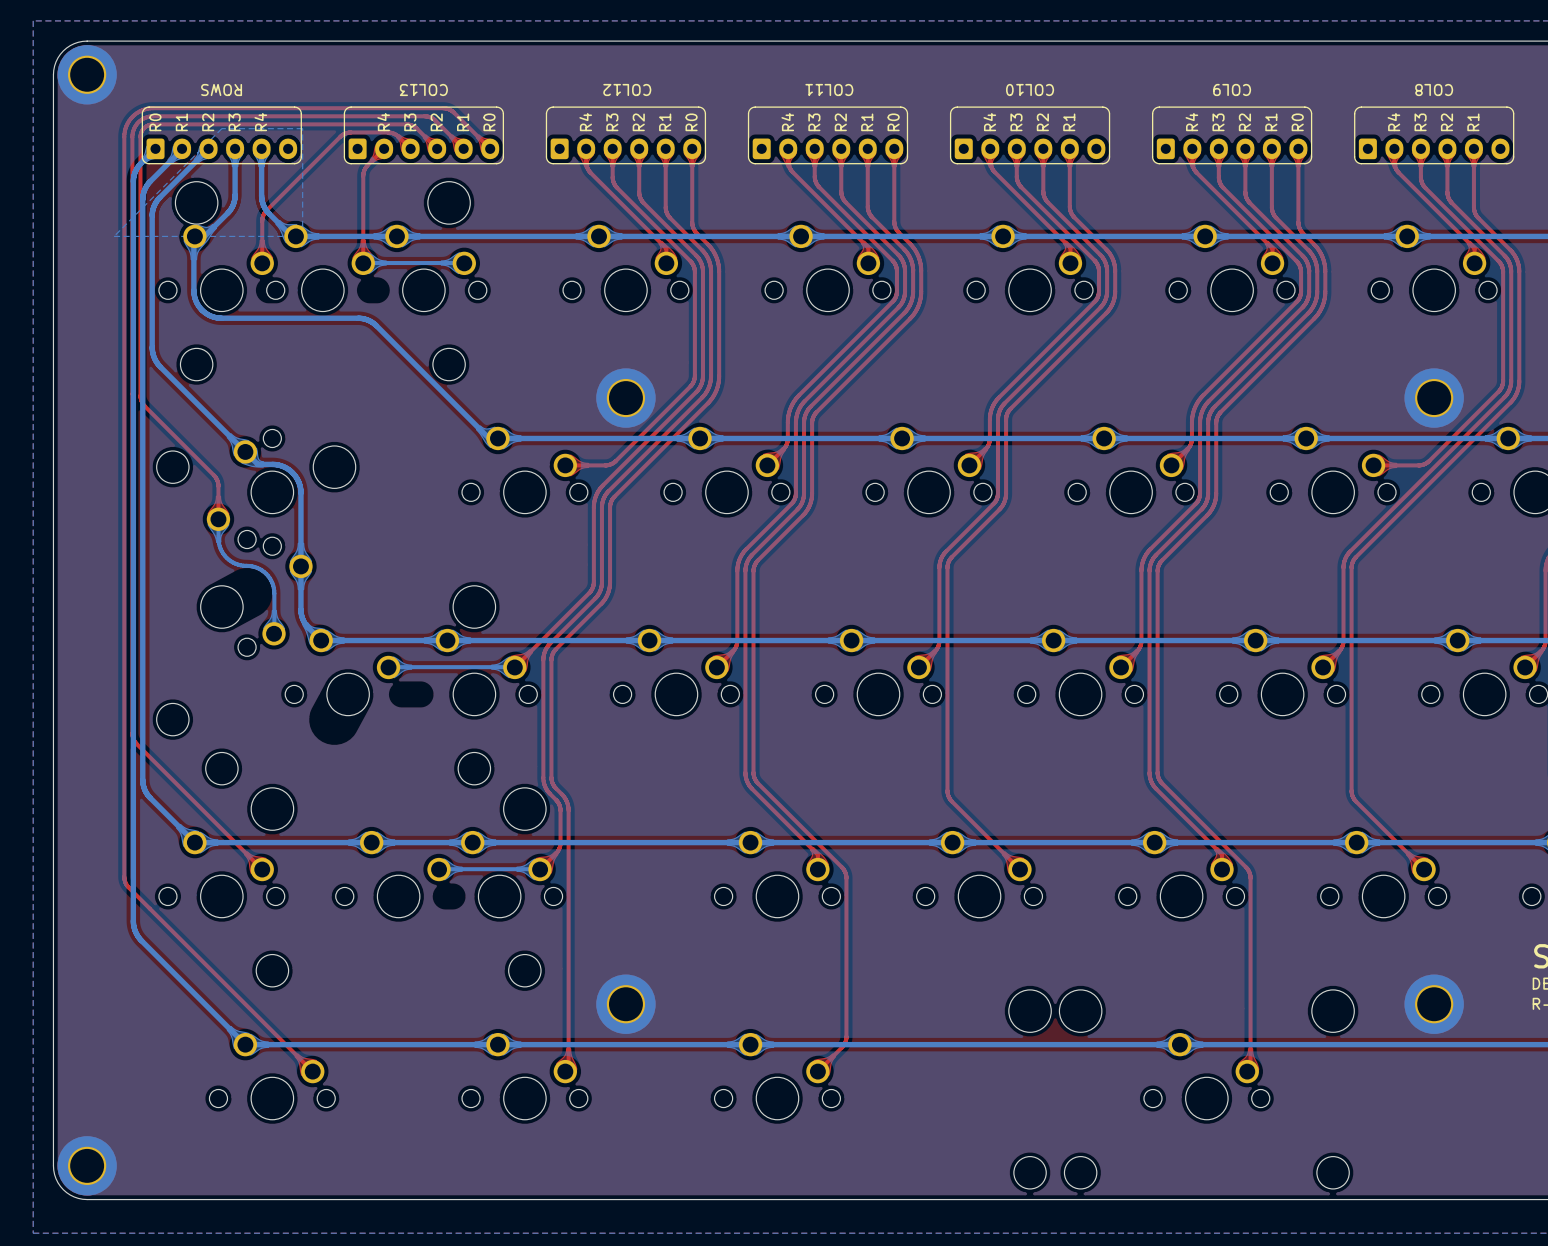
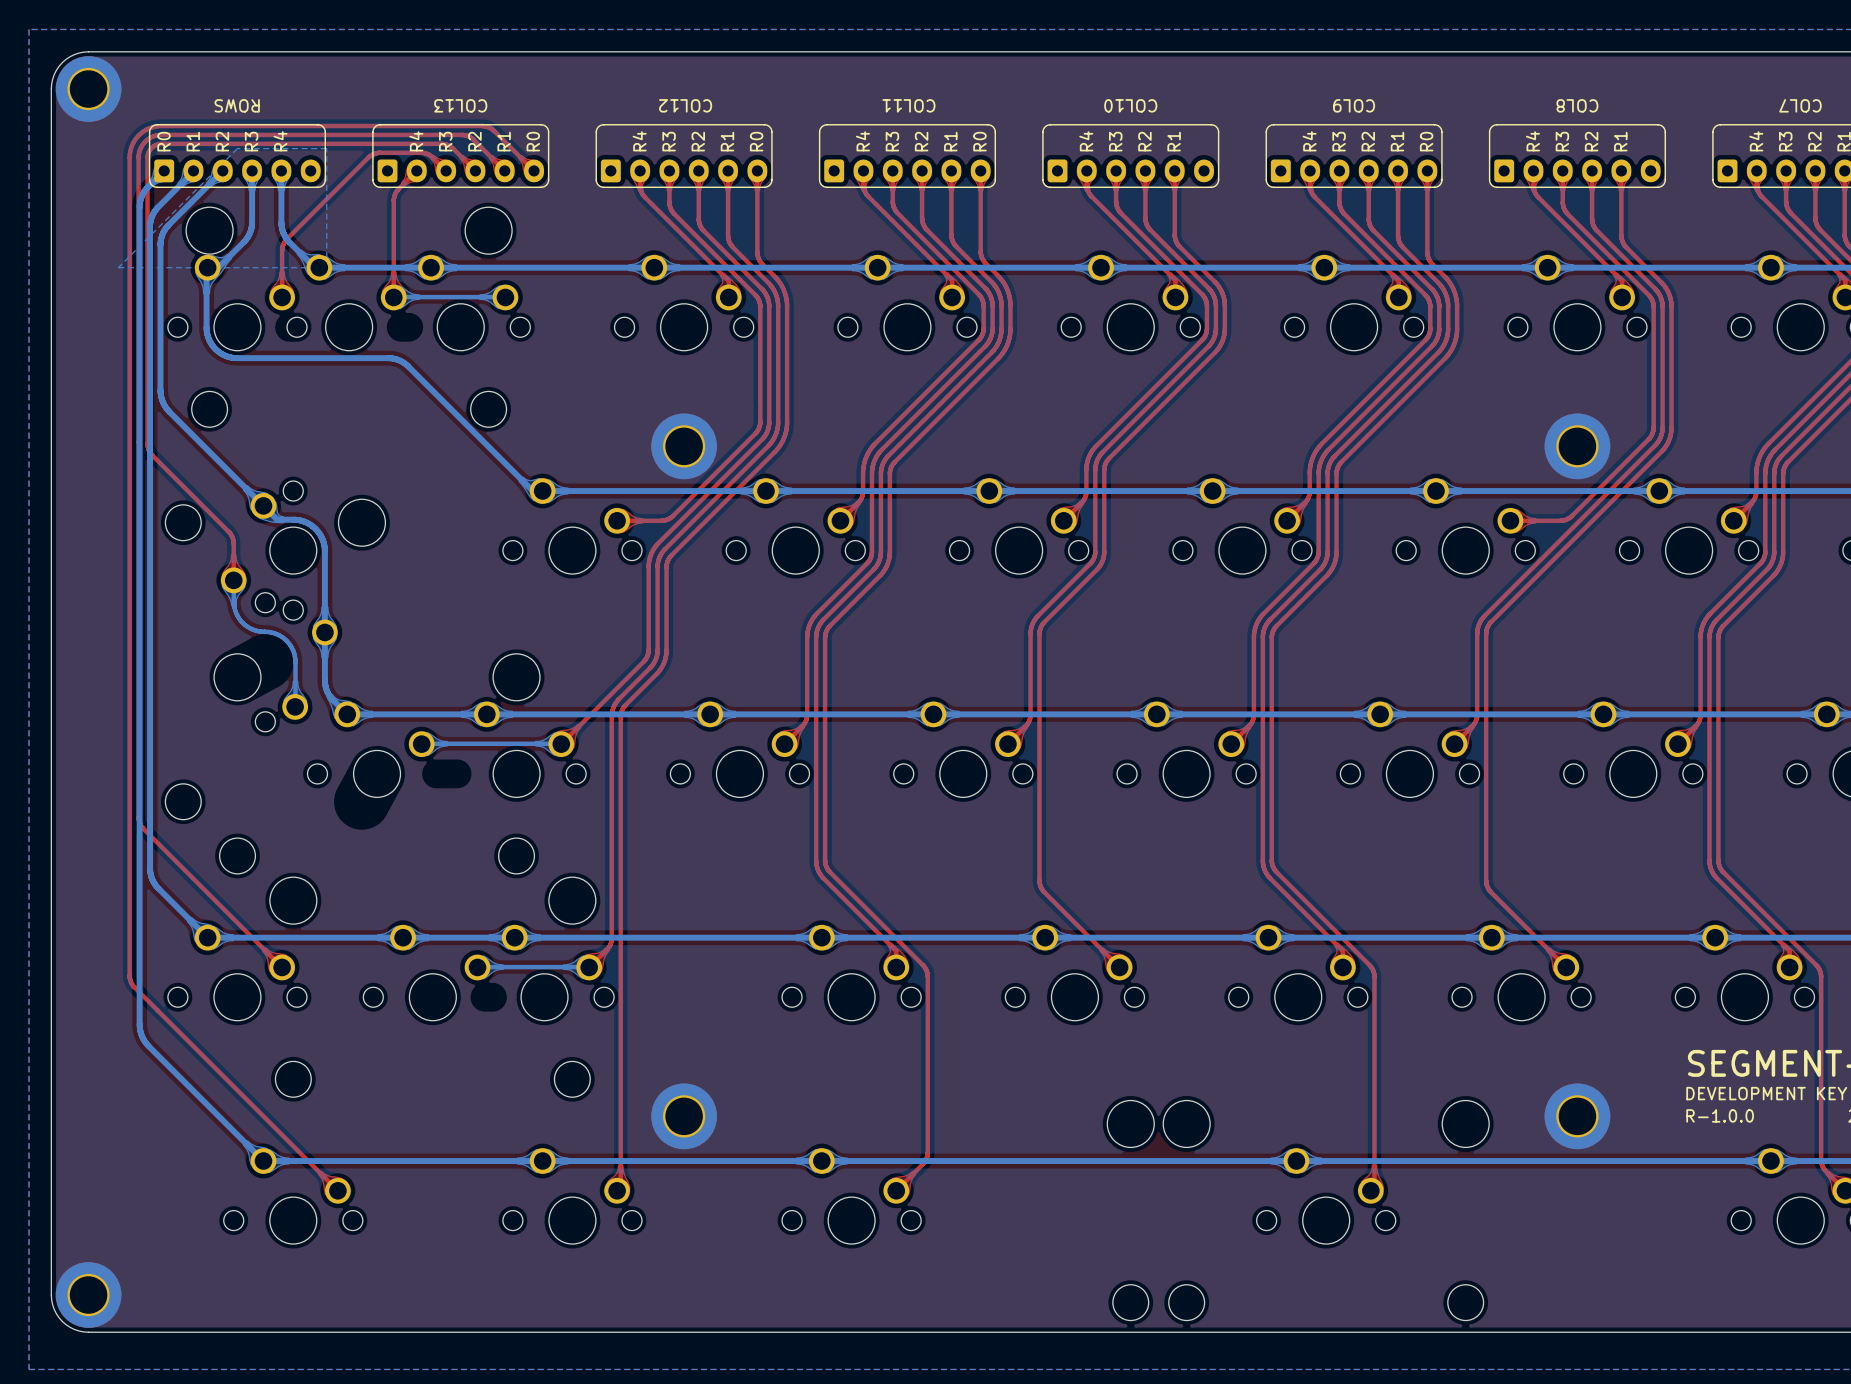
top track: (567, 626) (548, 645) (543, 656) (543, 778) -> (619, 698) (614, 705) (611, 715) (611, 939)
top track: (573, 632) (554, 650) (551, 660) (551, 779) (554, 786) (565, 799) (568, 810) -> (625, 704) (620, 716) (620, 902)
top track: (543, 779) (546, 789) (560, 807) (560, 842) -> none

